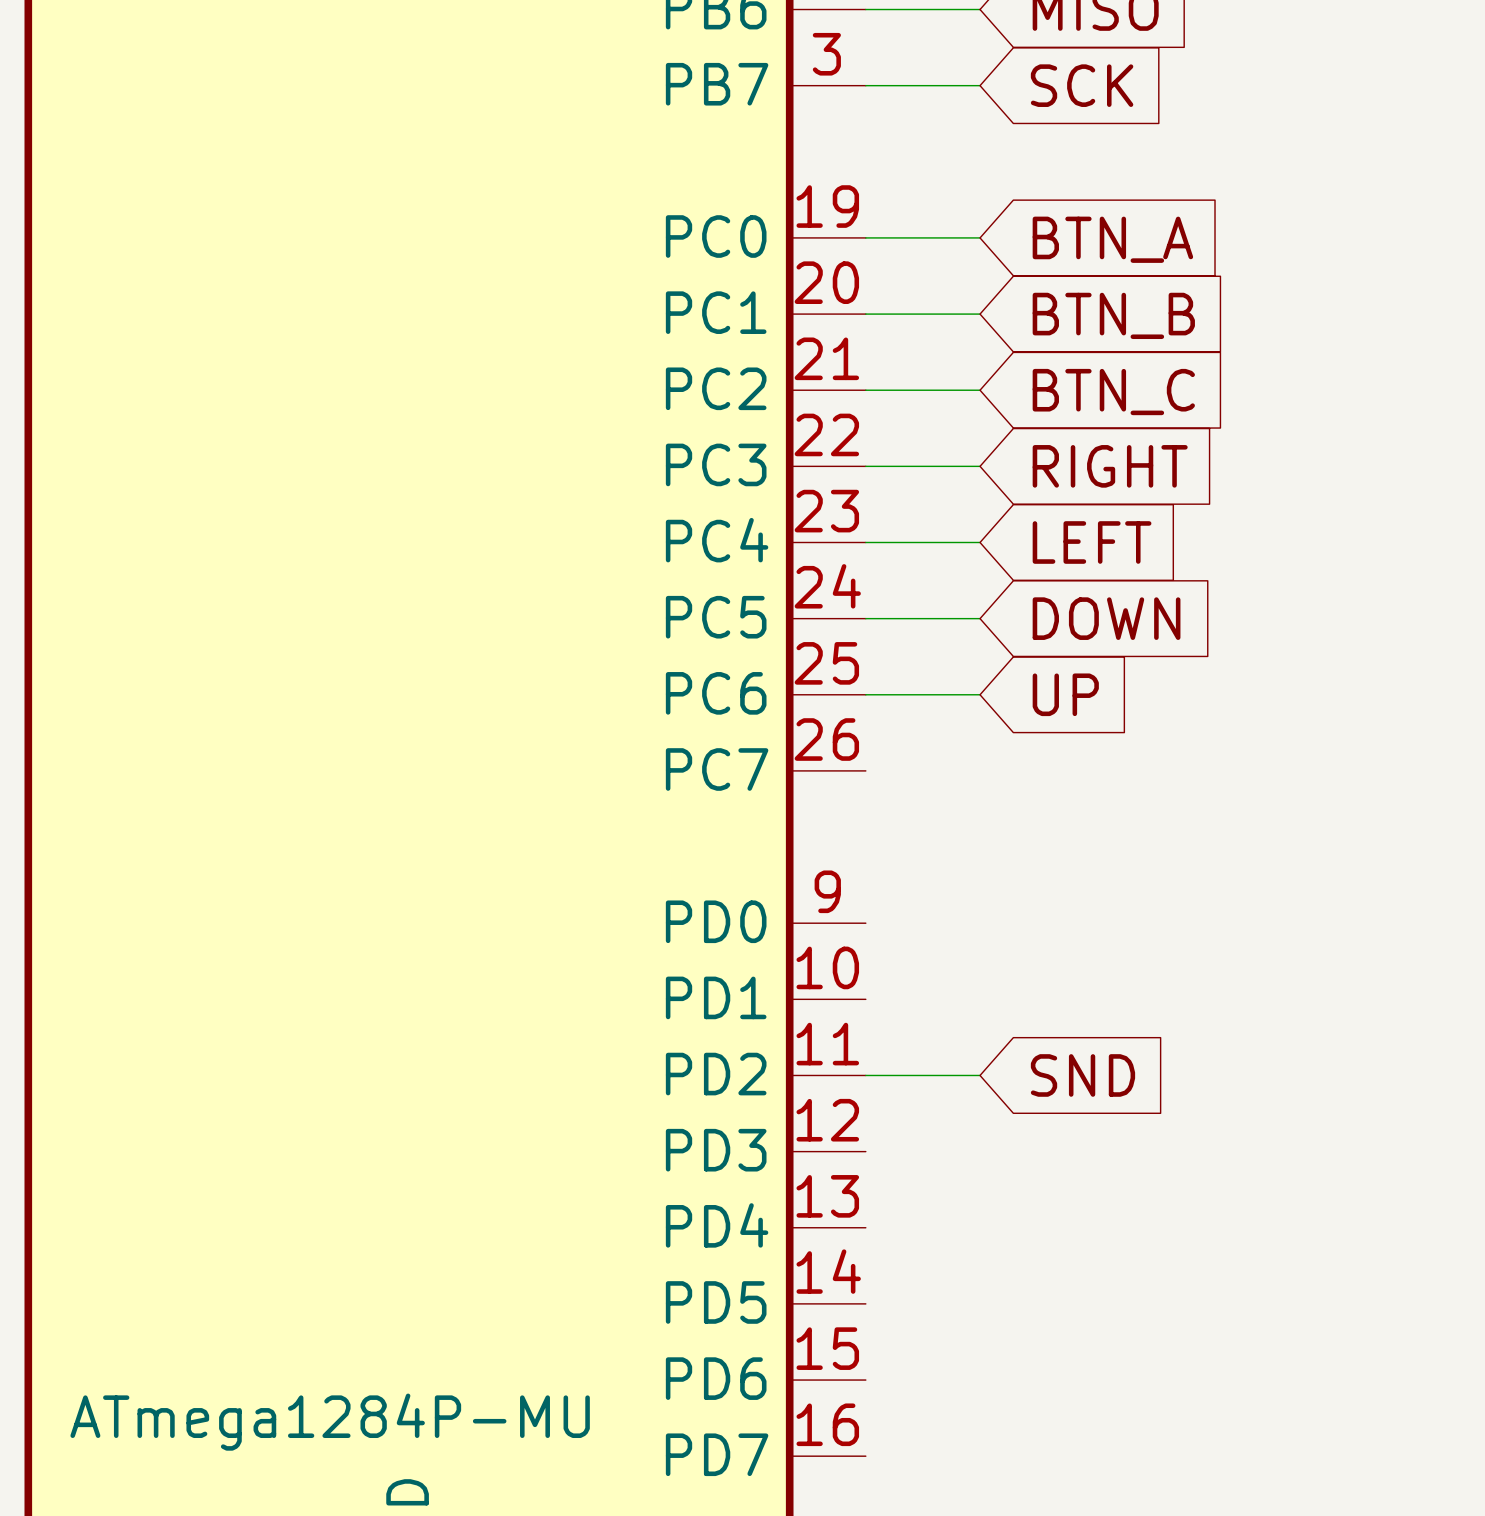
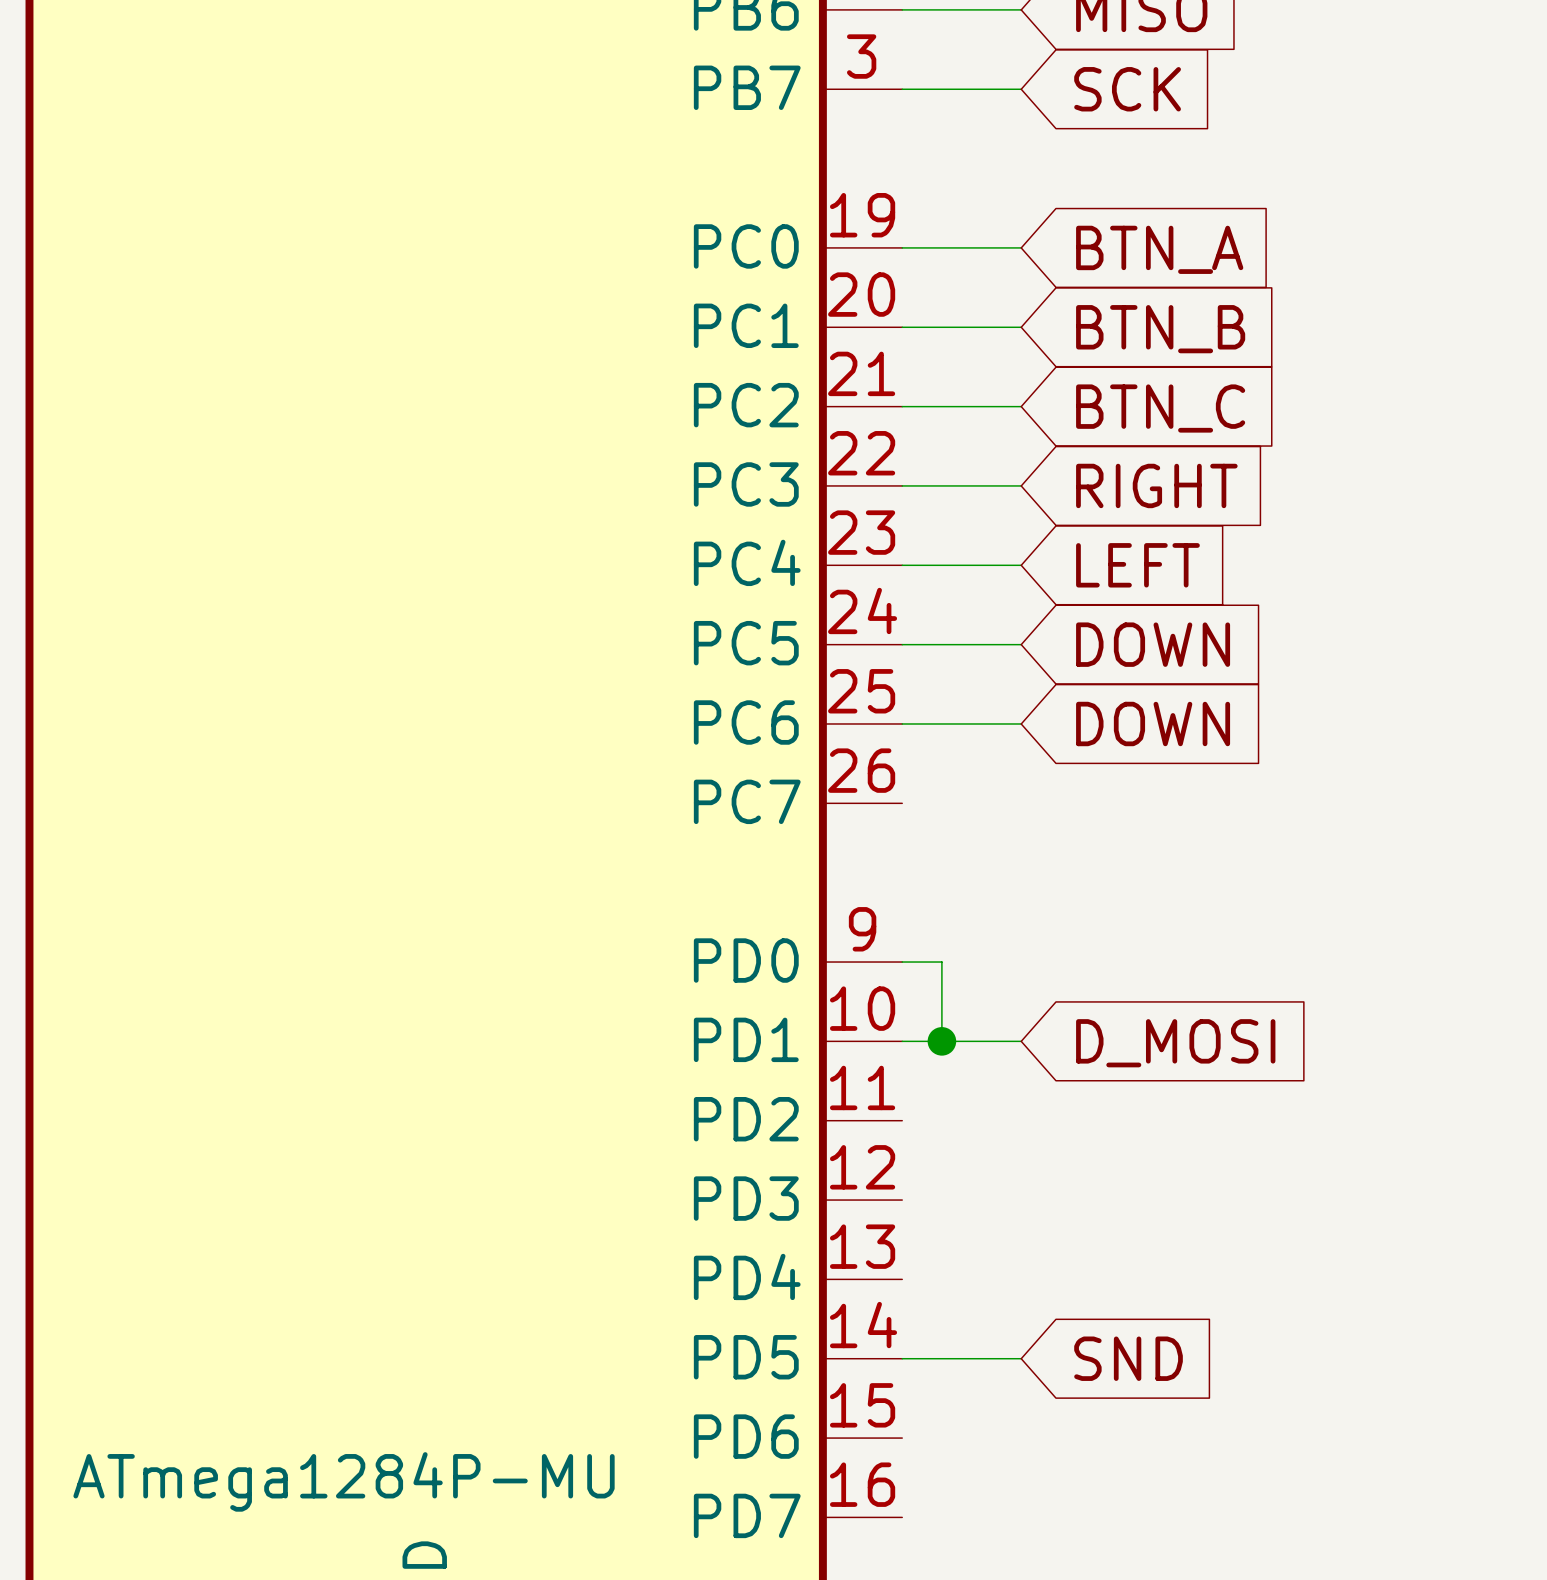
global label: UP (1065, 694) -> DOWN (1153, 723)
wire: none -> (902, 962) (941, 962) (941, 1041)
junction: none -> (941, 1041)
global label: none -> D_MOSI (1175, 1043)
wire: (865, 1075) (980, 1075) -> (902, 1041) (1021, 1041)
global label position: SND (1082, 1075) -> SND (1128, 1358)
wire: none -> (902, 1358) (1021, 1358)

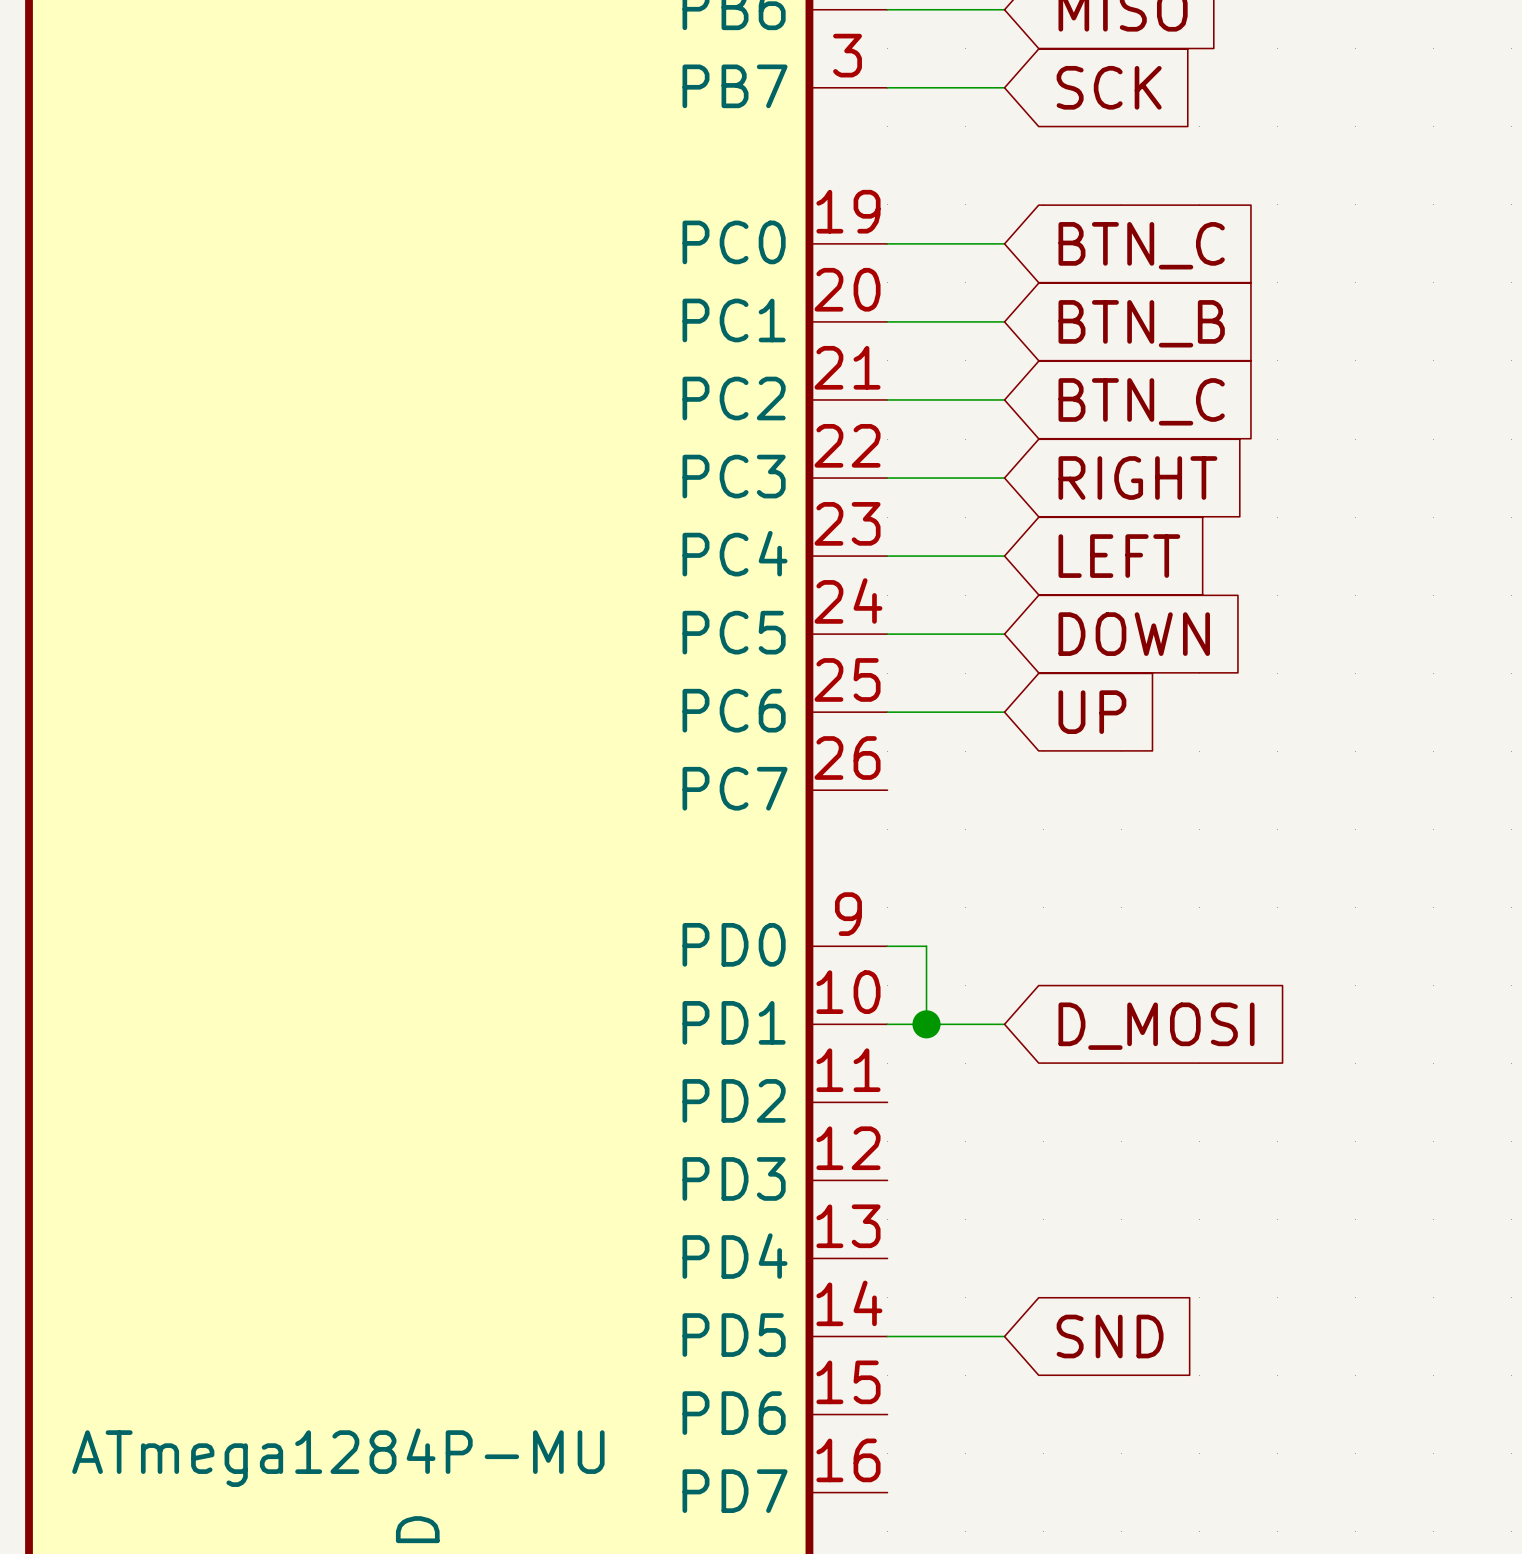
global label: BTN_A (1159, 249) -> BTN_C (1141, 245)
global label: DOWN (1153, 723) -> UP (1092, 712)

